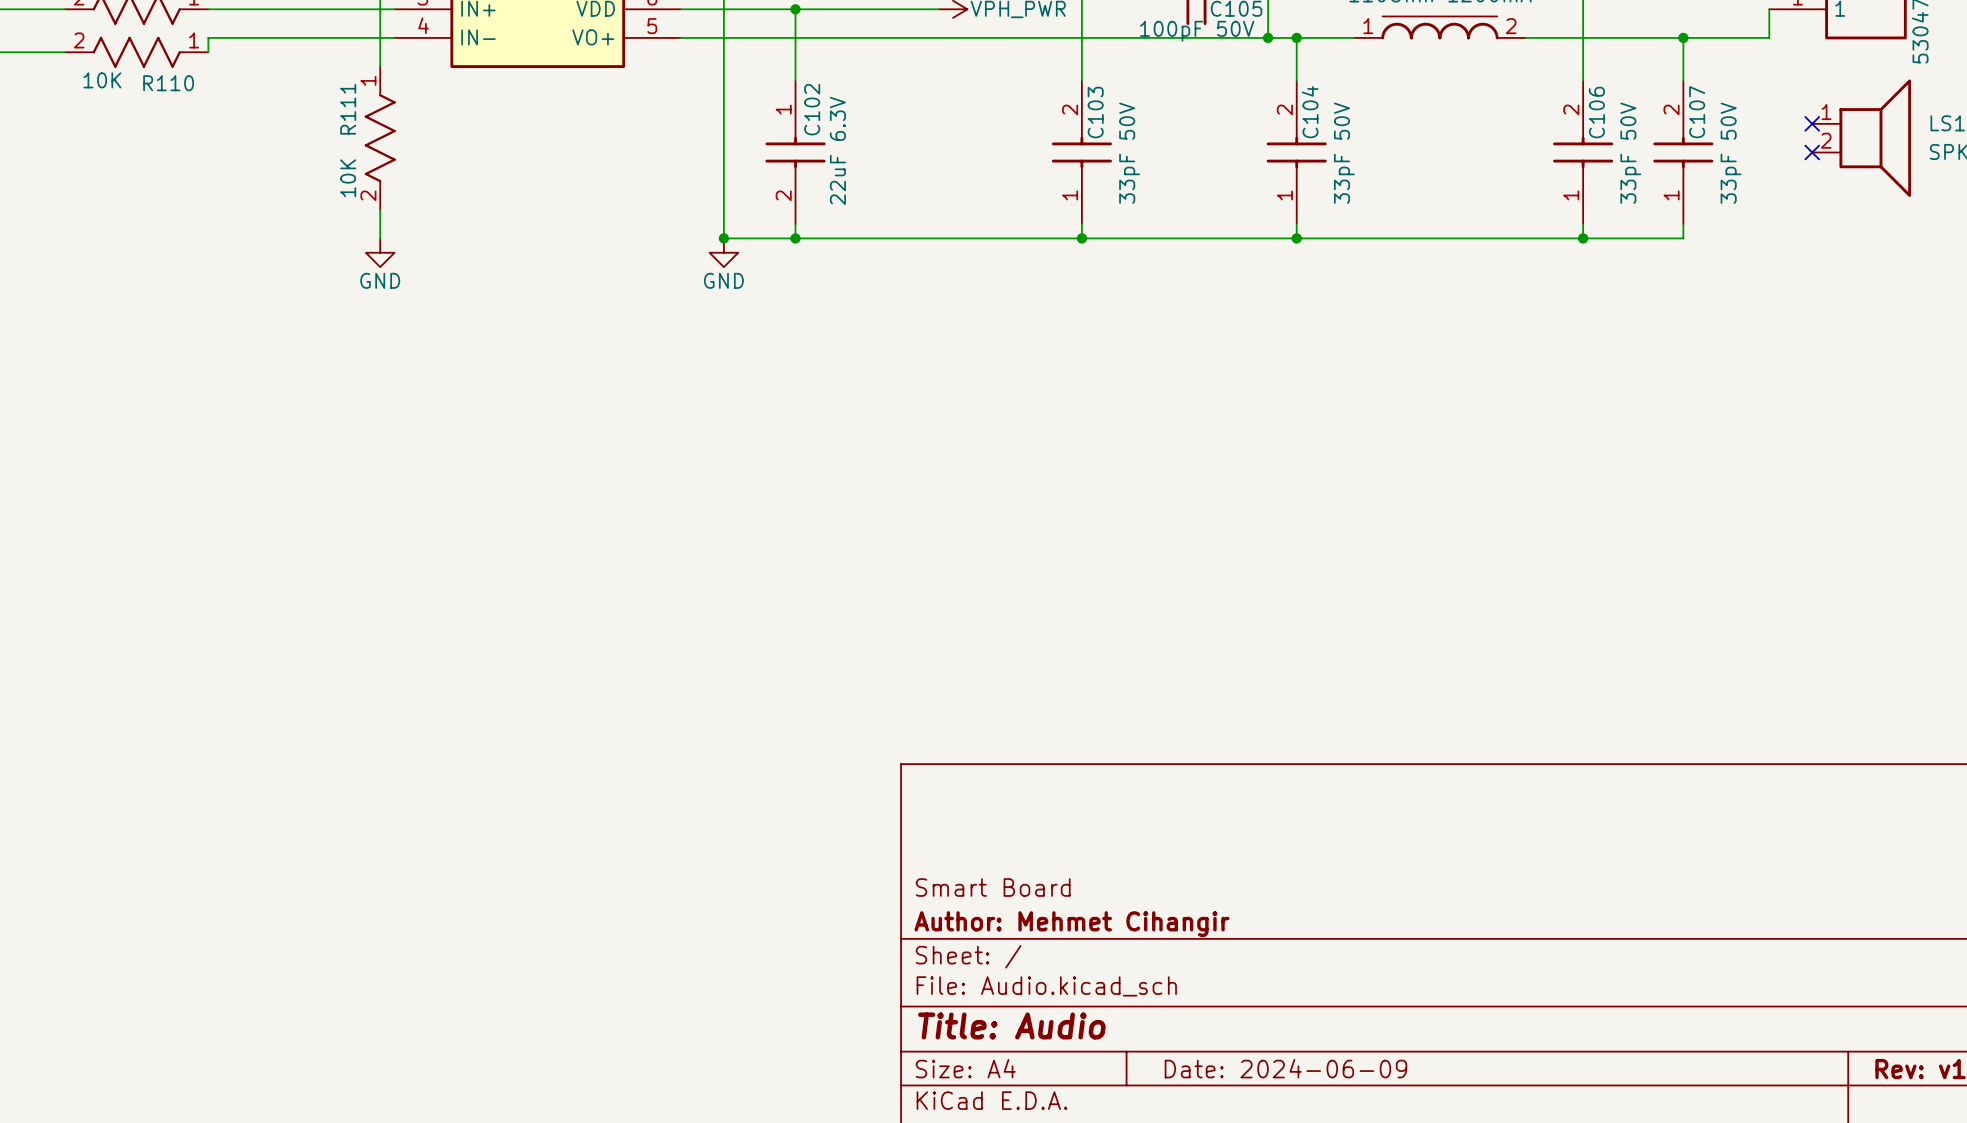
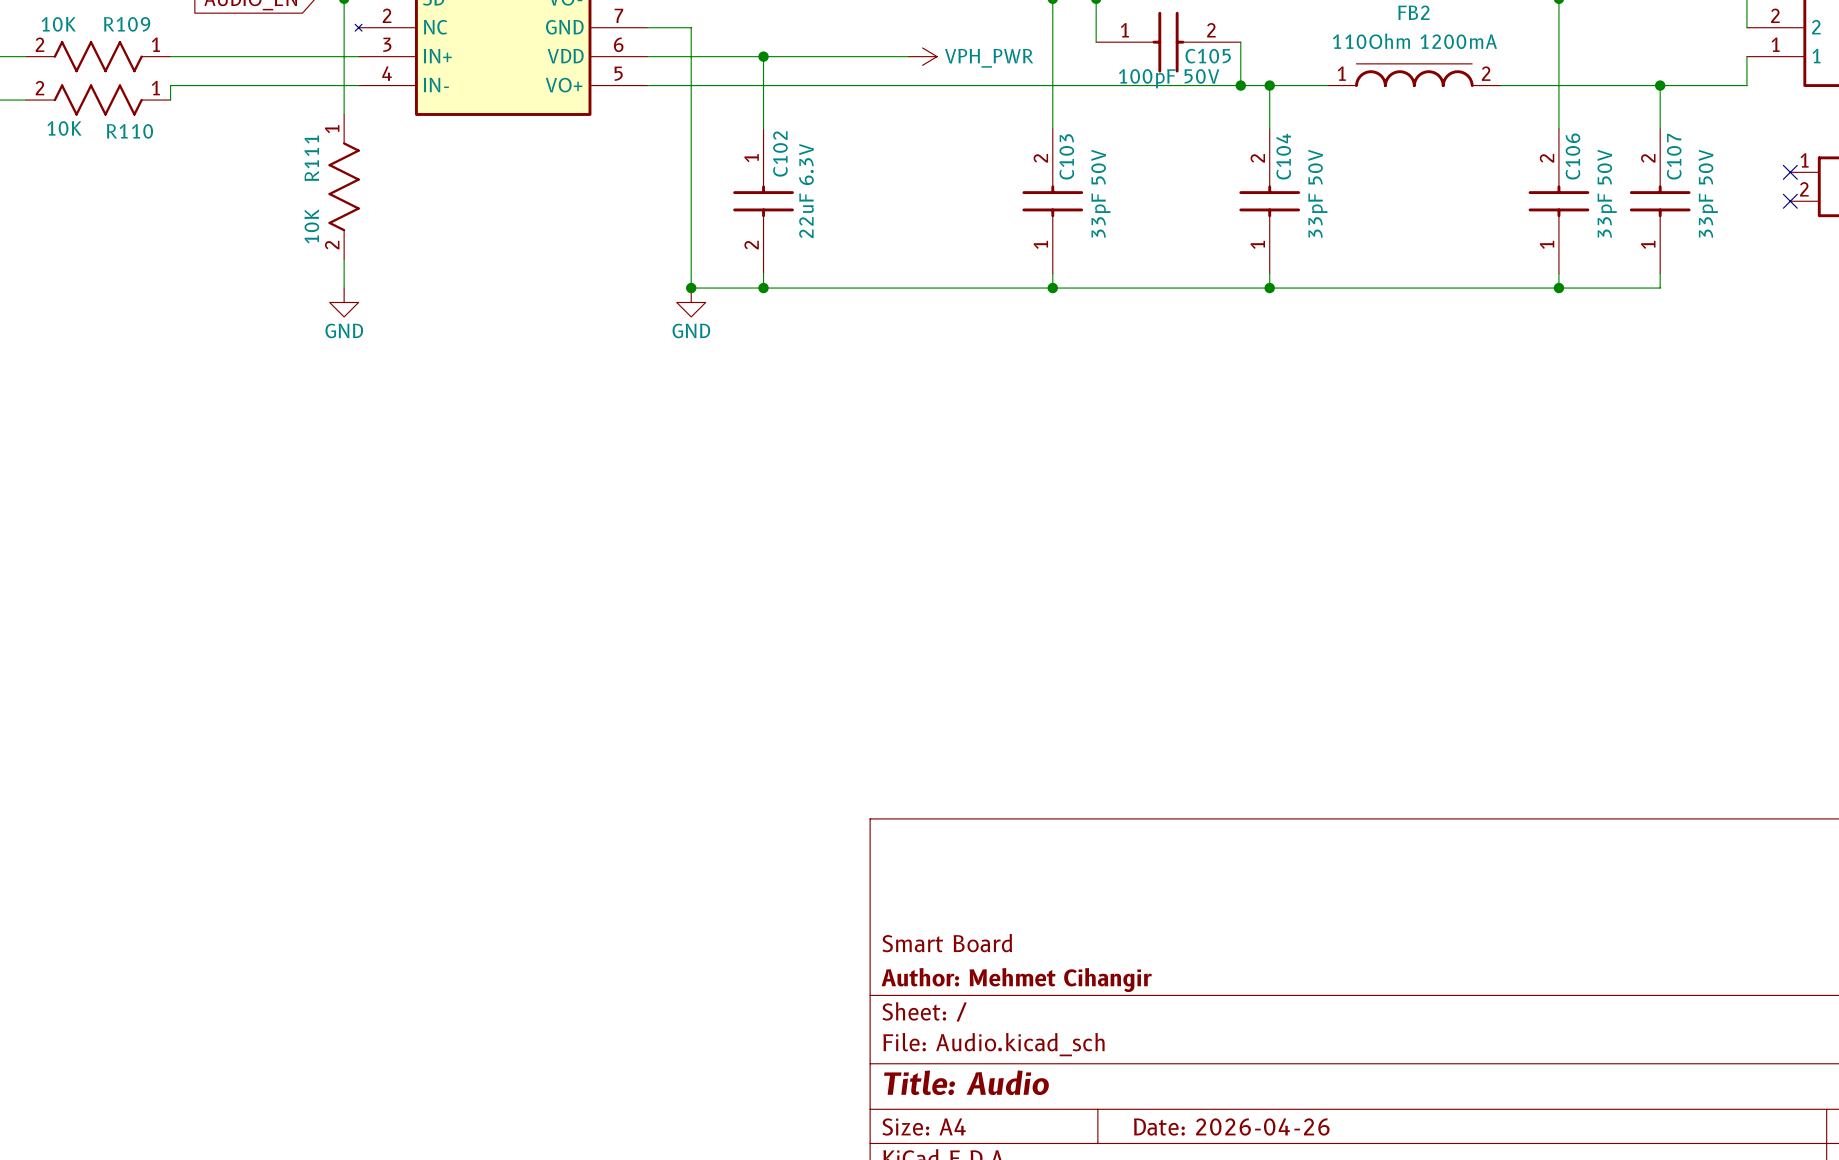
title block: Date: 2024-06-09 (1285, 1068) -> Date: 2026-04-26 (1231, 1126)

